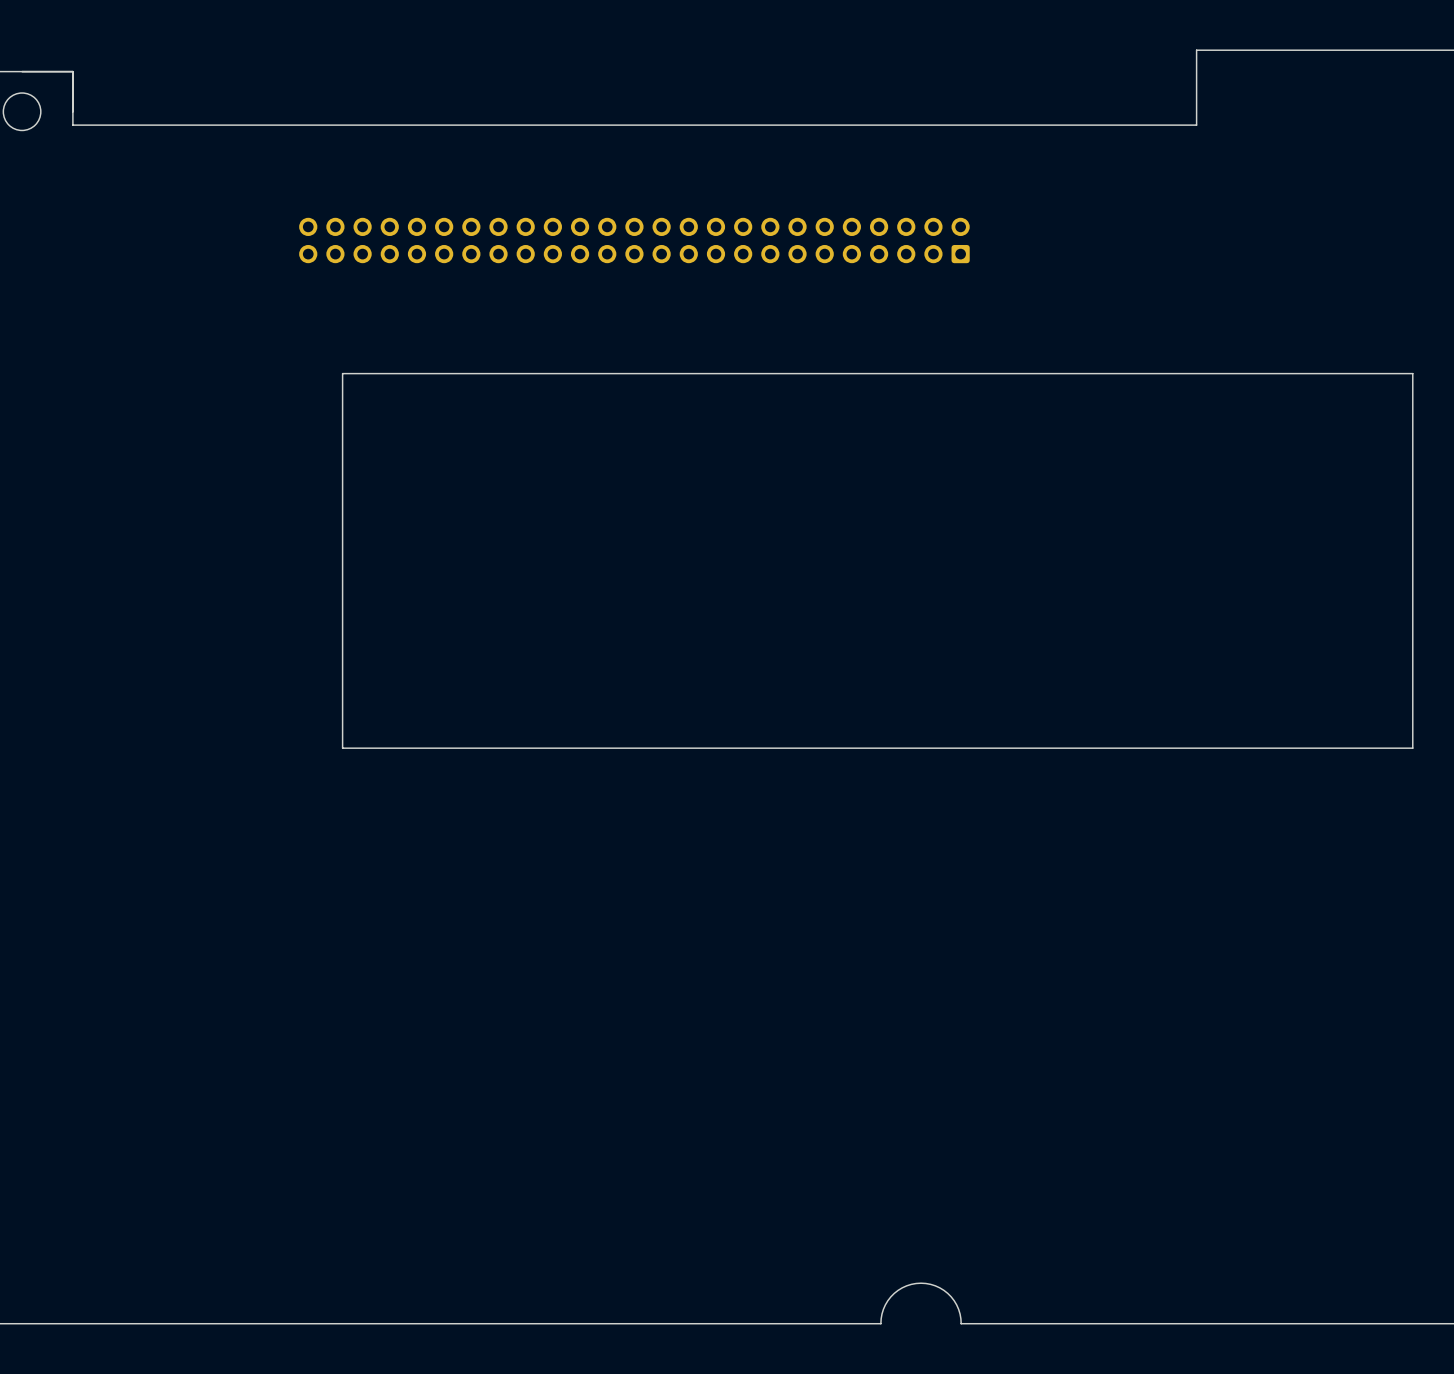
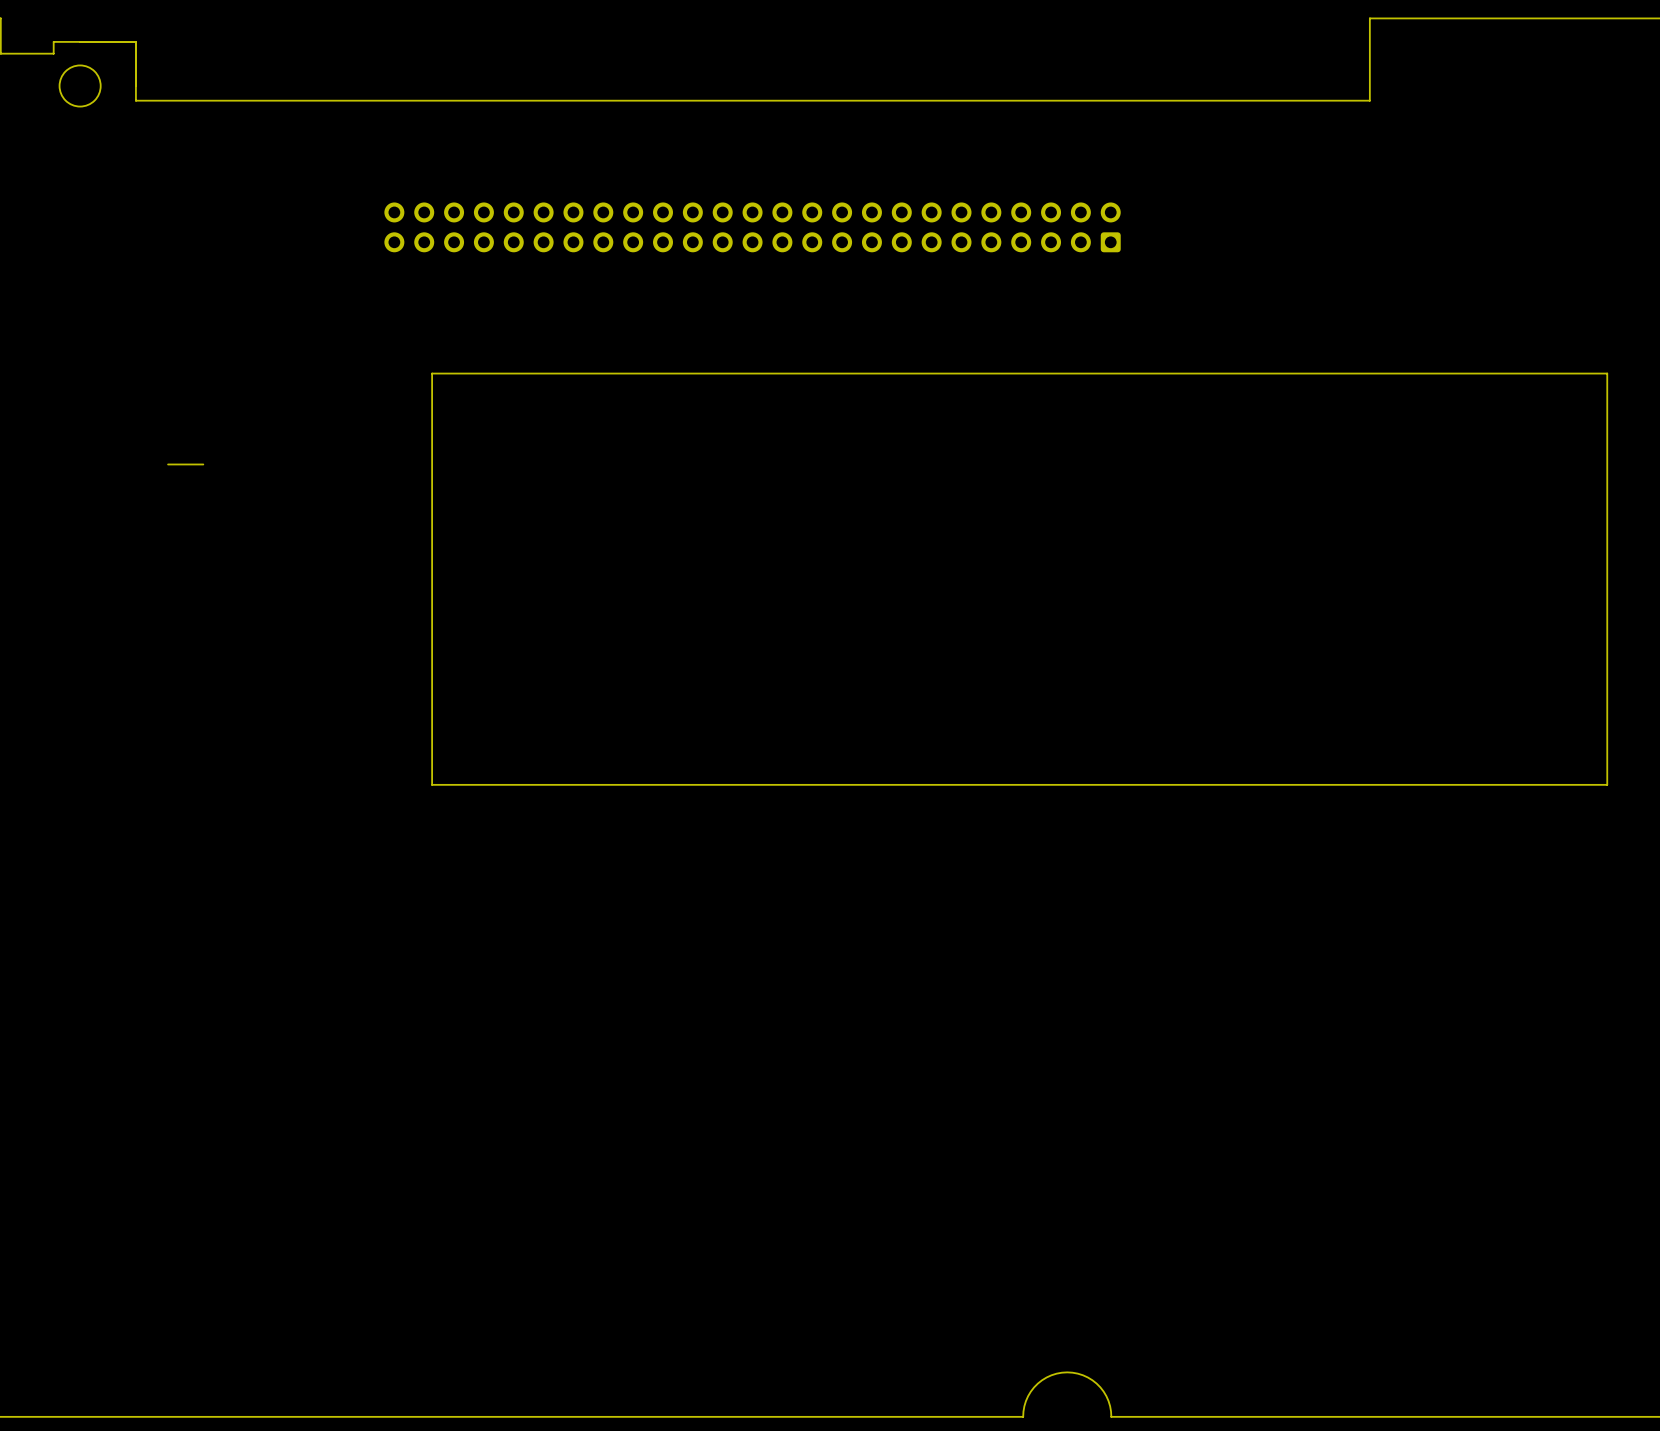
board edge: none -> (203, 464) (168, 464)

